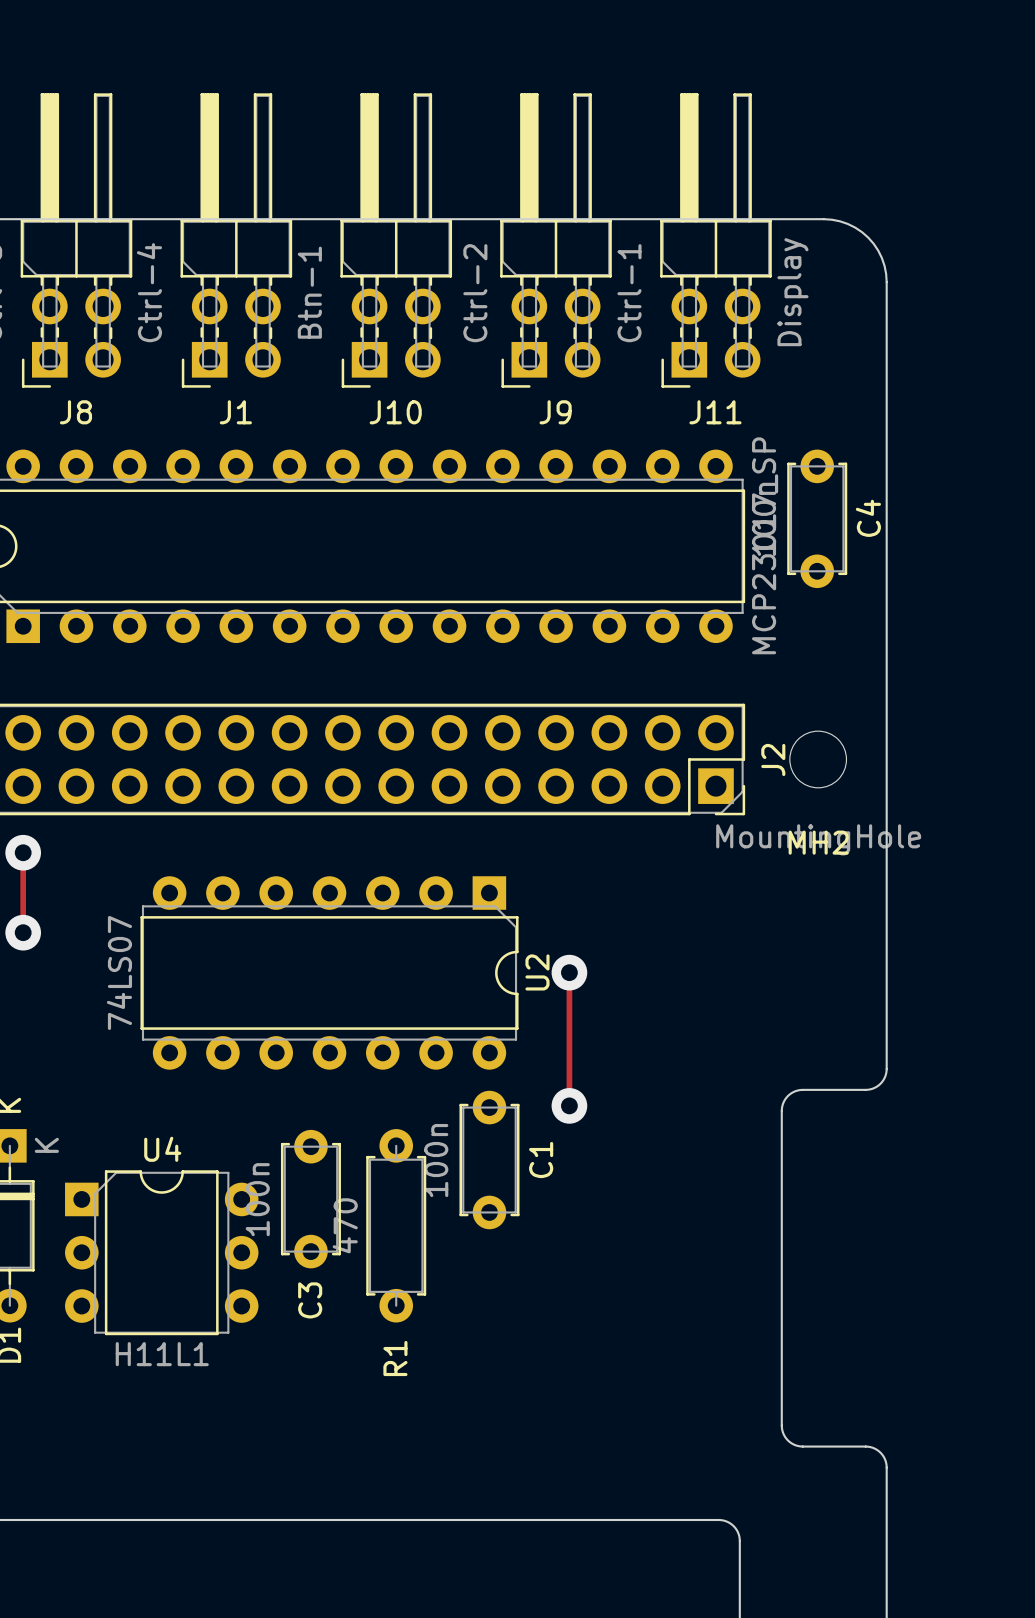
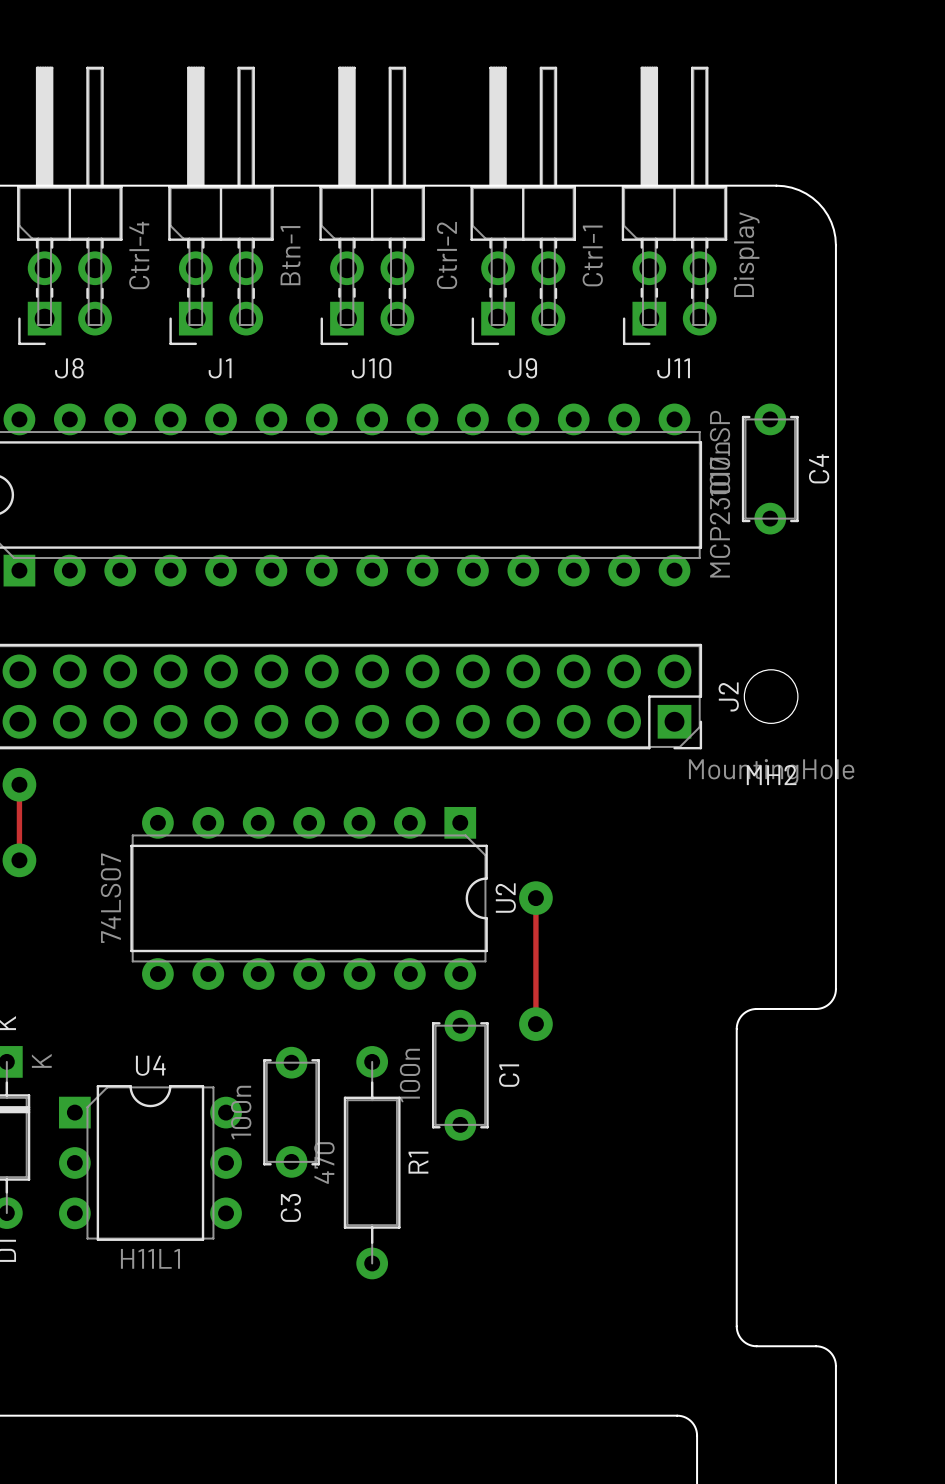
R1 footprint: [366, 1129, 427, 1323] -> [343, 1046, 401, 1280]
R1 name position: R1 (395, 1358) -> R1 (418, 1162)

